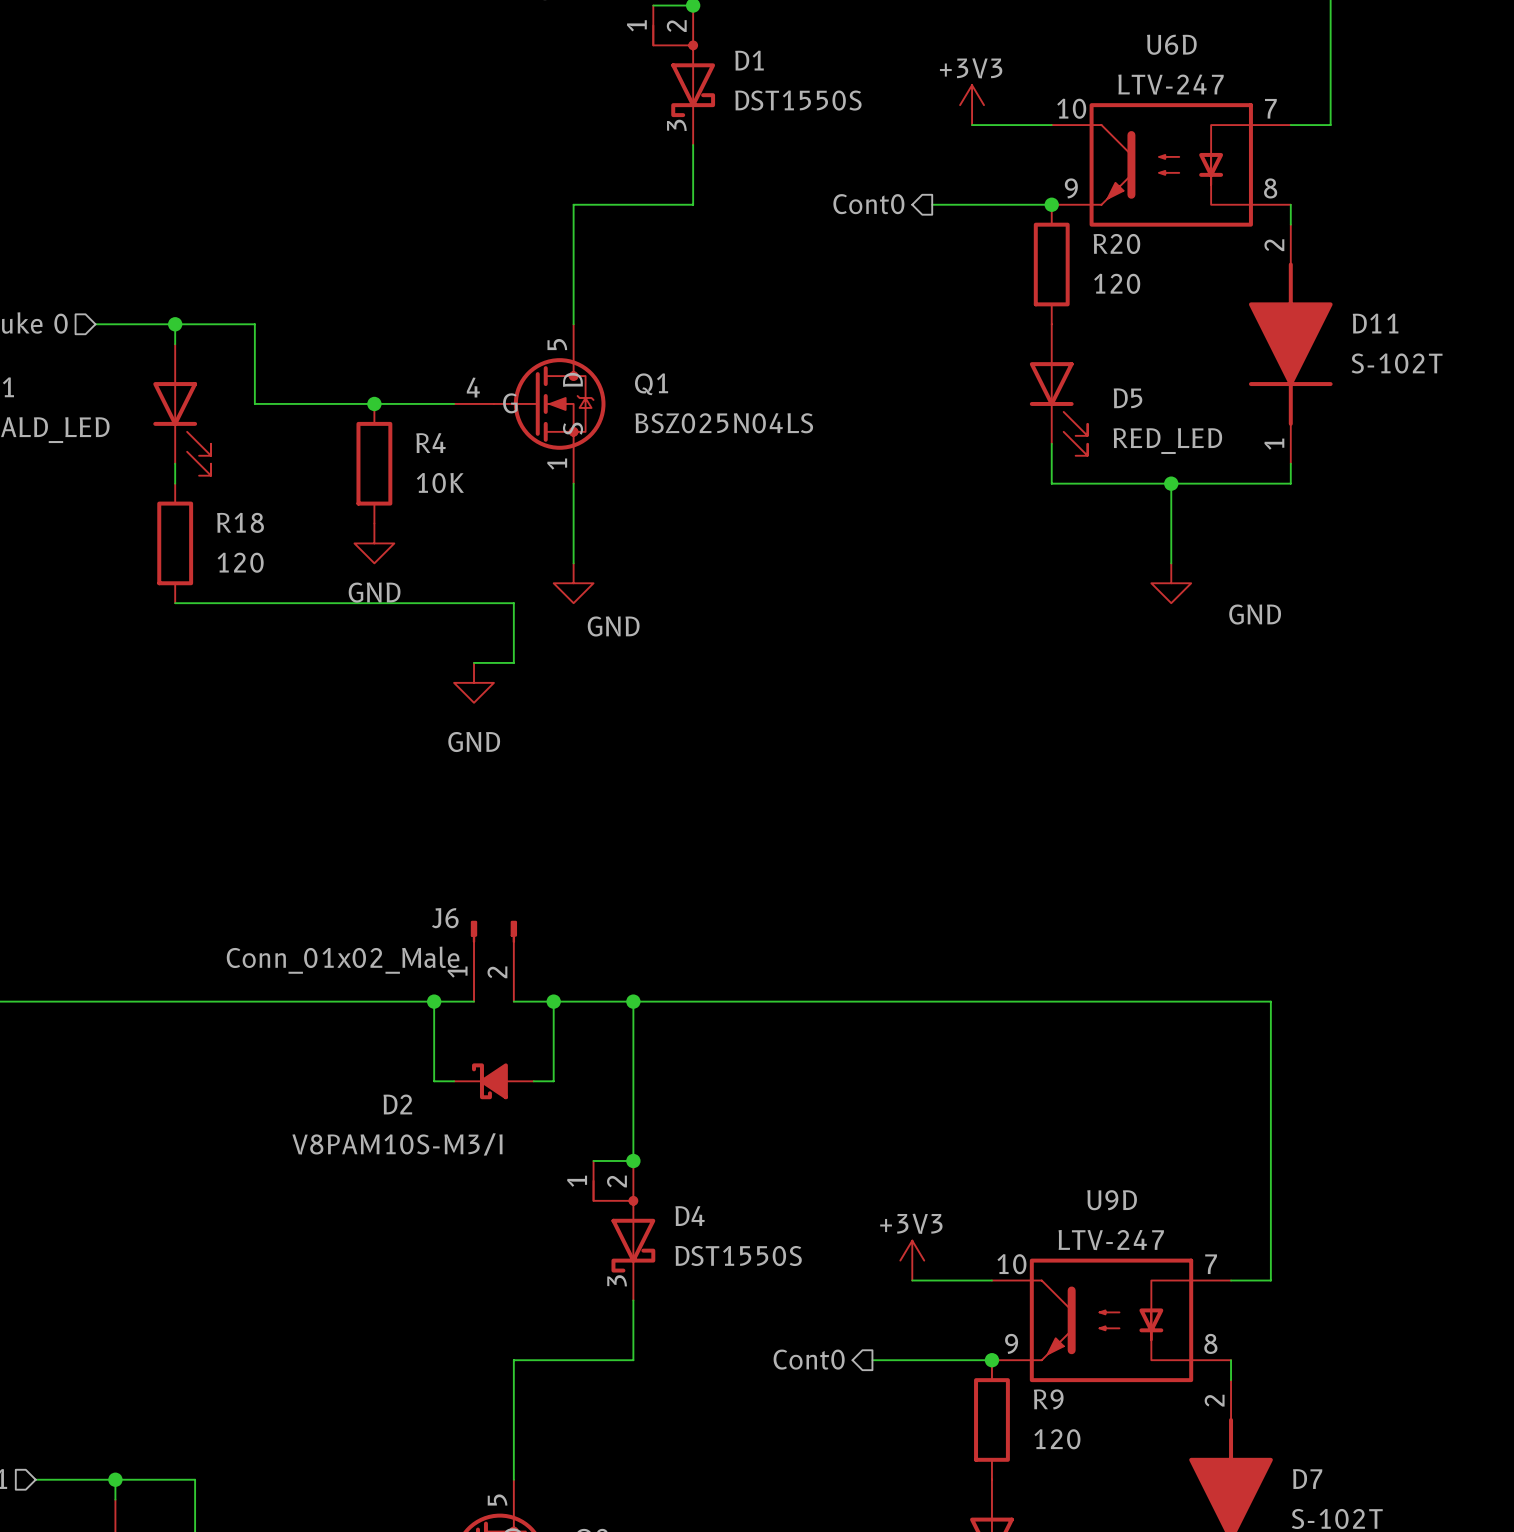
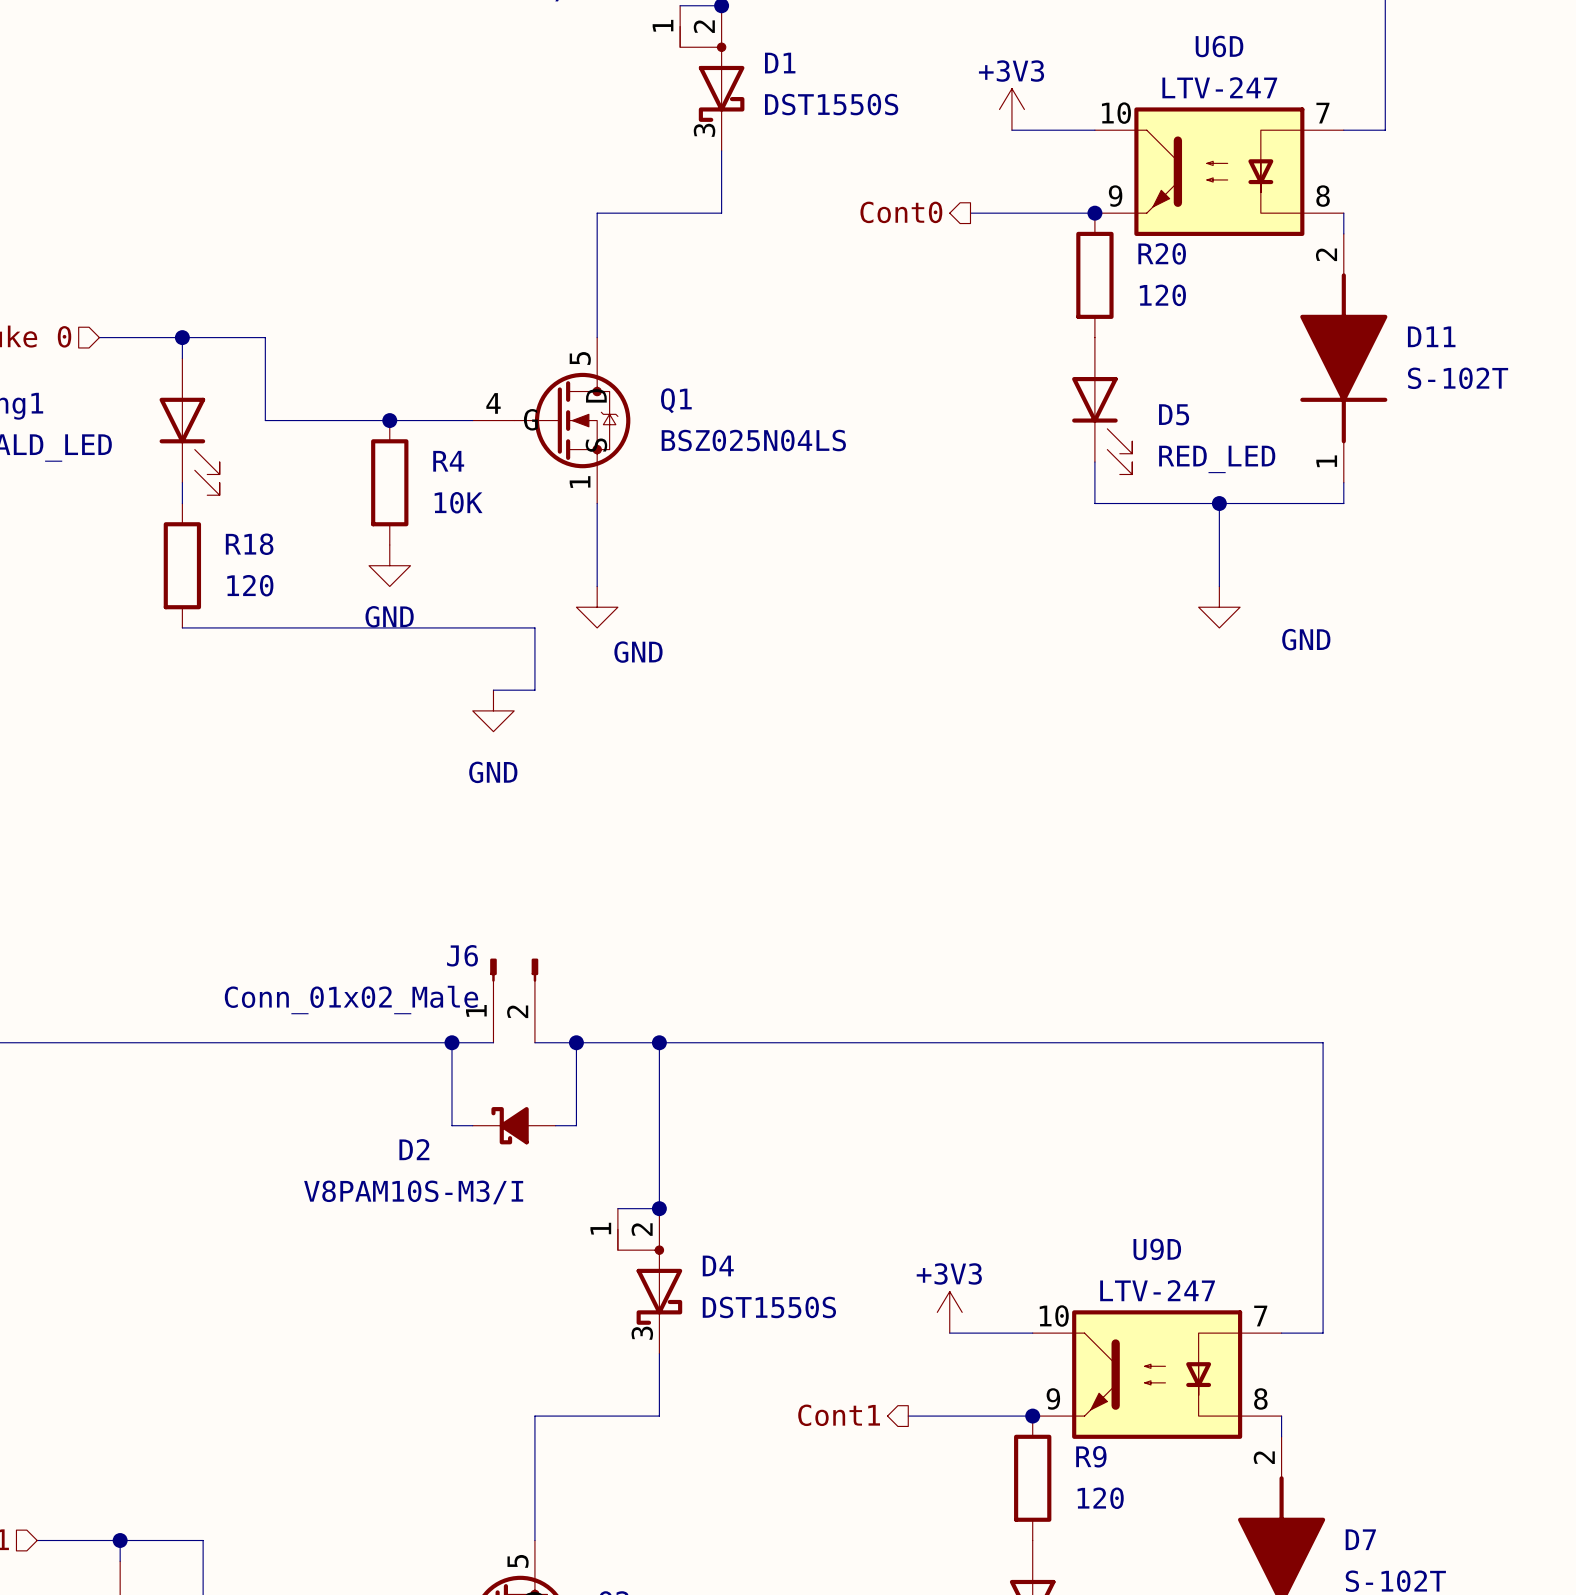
hierarchical label: Cont0 (809, 1359) -> Cont1 (839, 1415)

